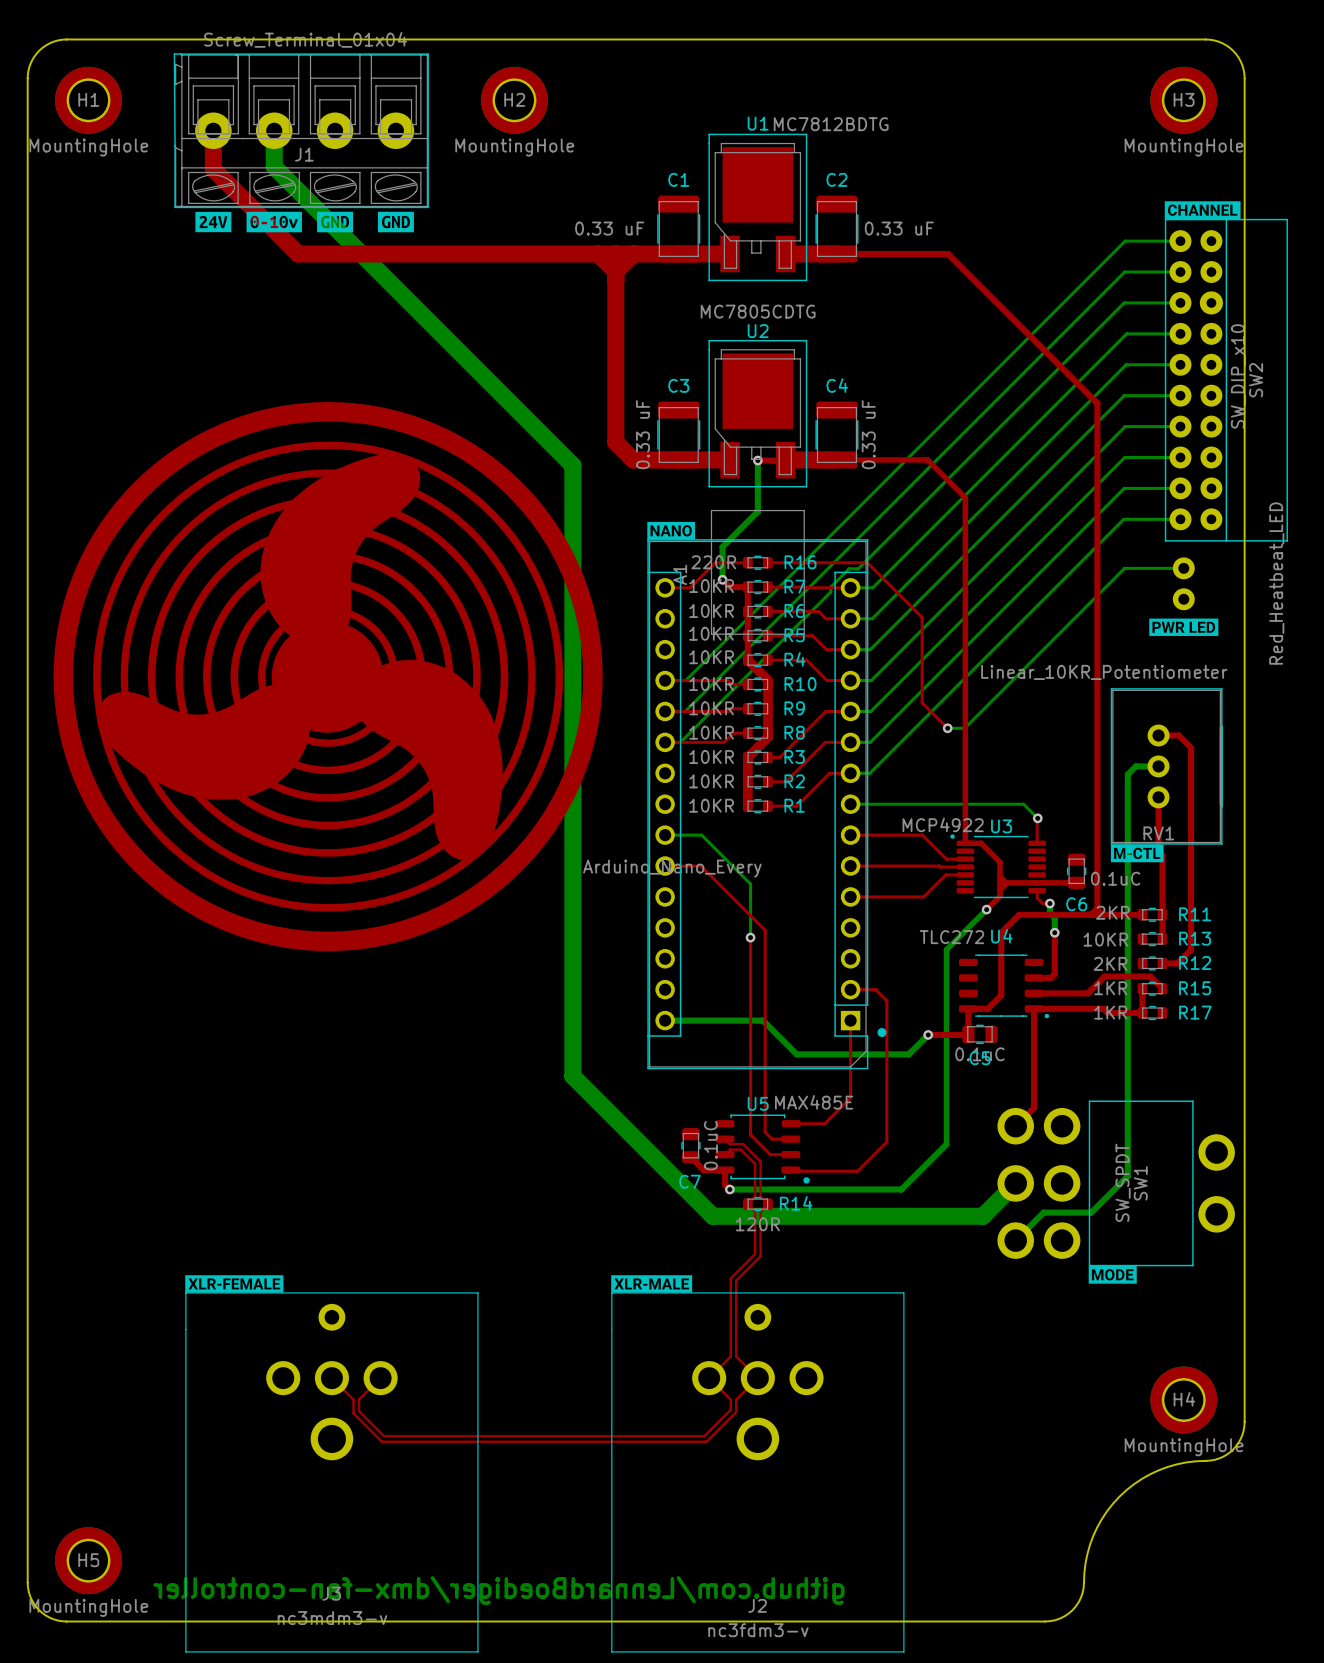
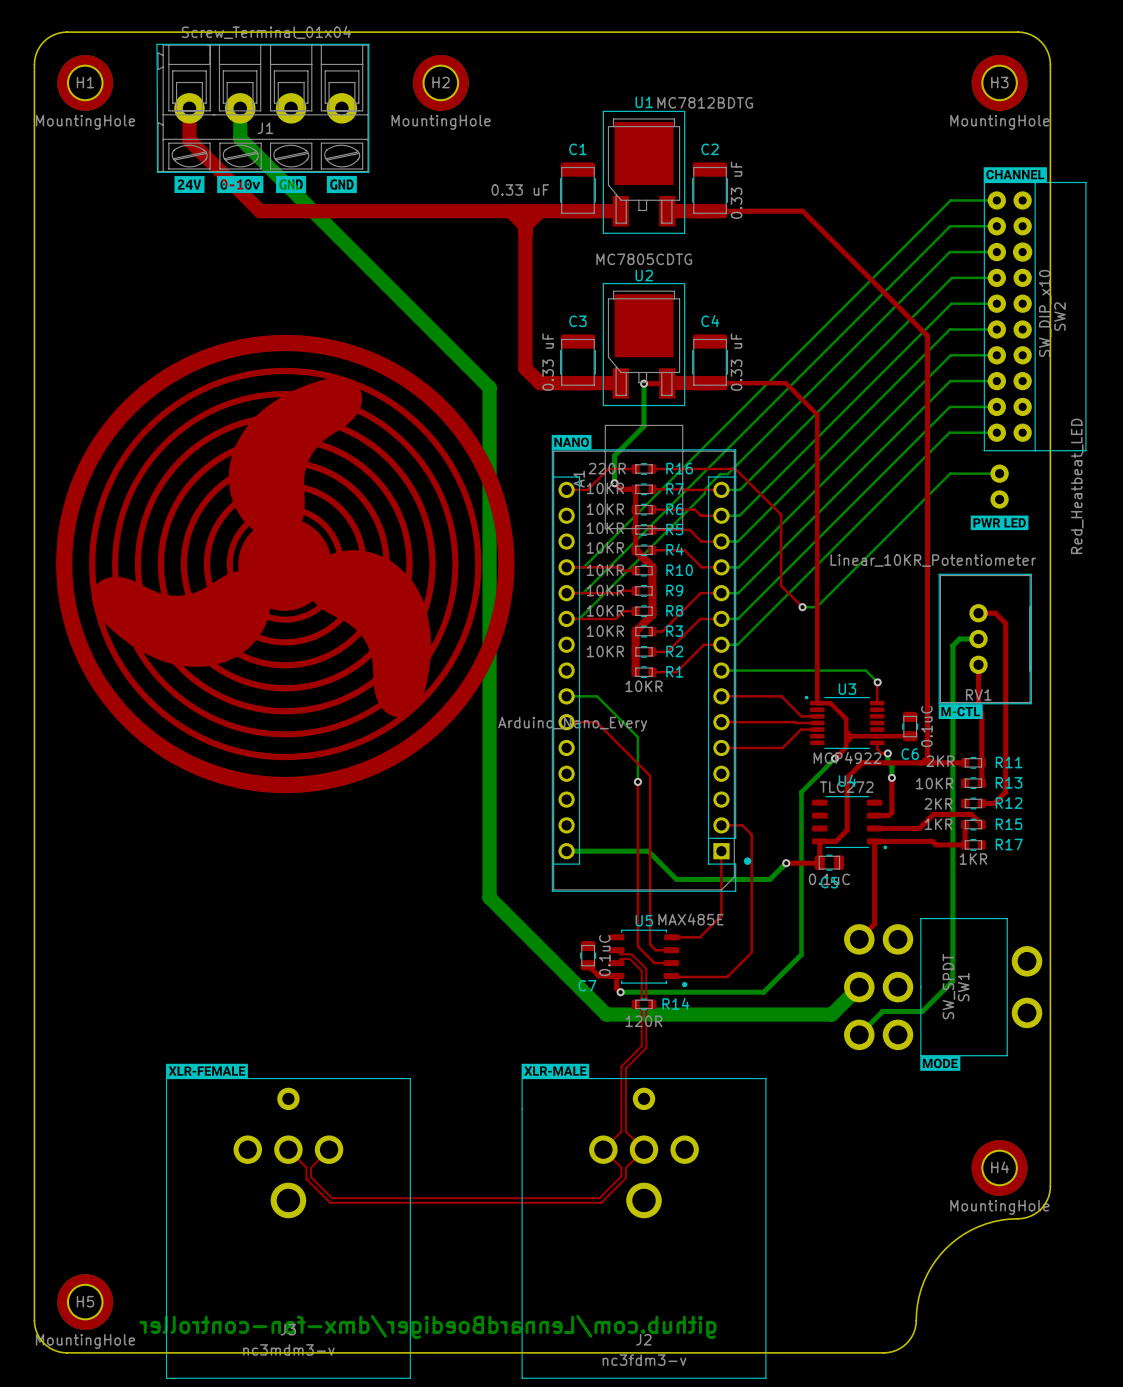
C2 value rotation: 0° (899, 228) -> 90° counterclockwise (736, 190)
R1 value position: 10KR (711, 805) -> 10KR (644, 686)
U3 value position: MCP4922 (943, 824) -> MCP4922 (847, 757)
C6 value rotation: 0° (1115, 878) -> 90° counterclockwise (926, 726)
U4 value position: TLC272 (951, 937) -> TLC272 (846, 787)
R17 value position: 1KR (1110, 1012) -> 1KR (973, 859)

